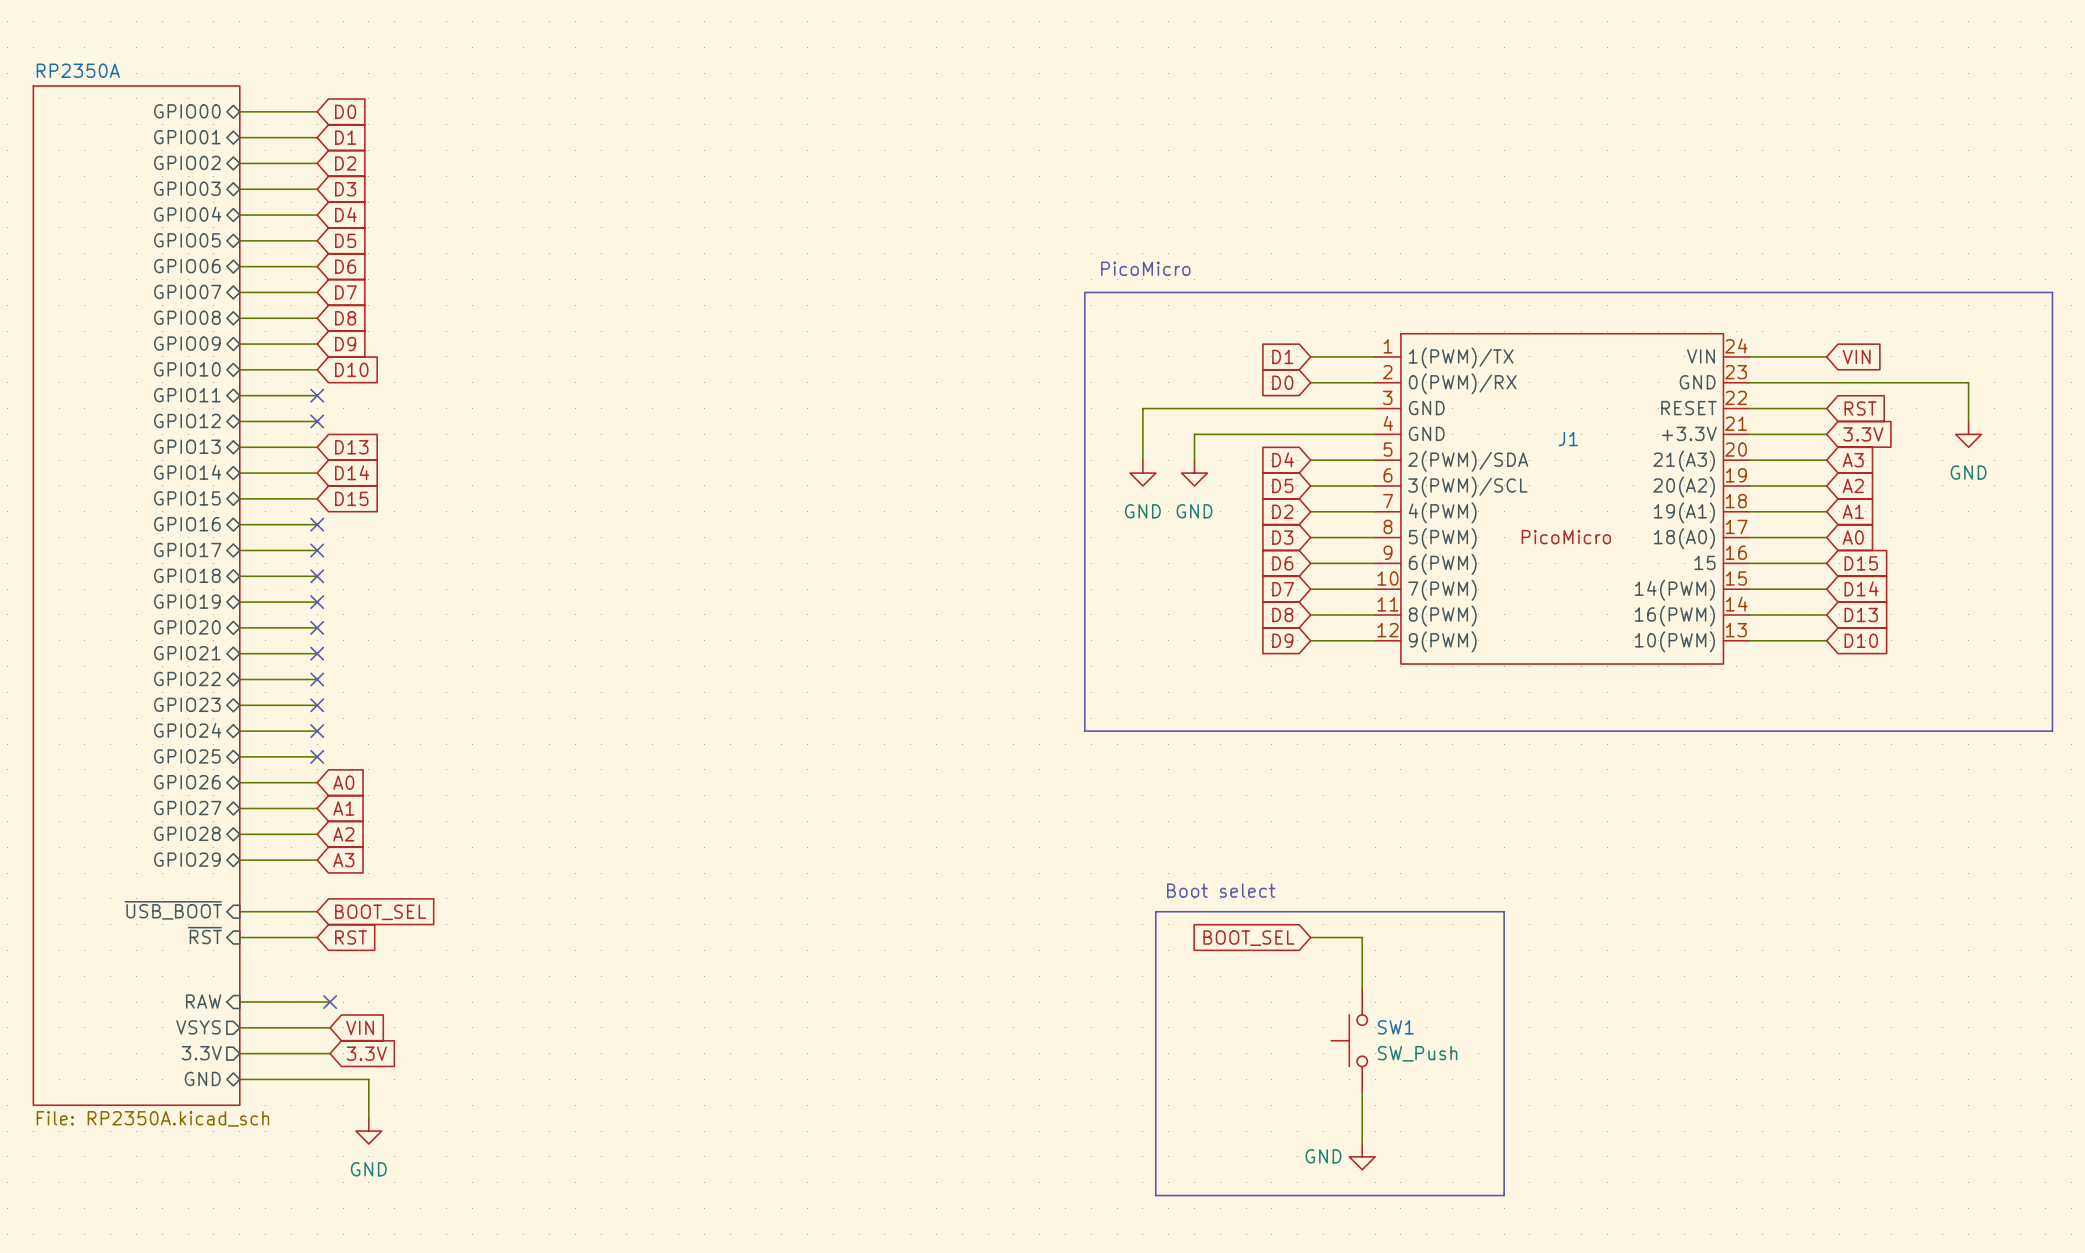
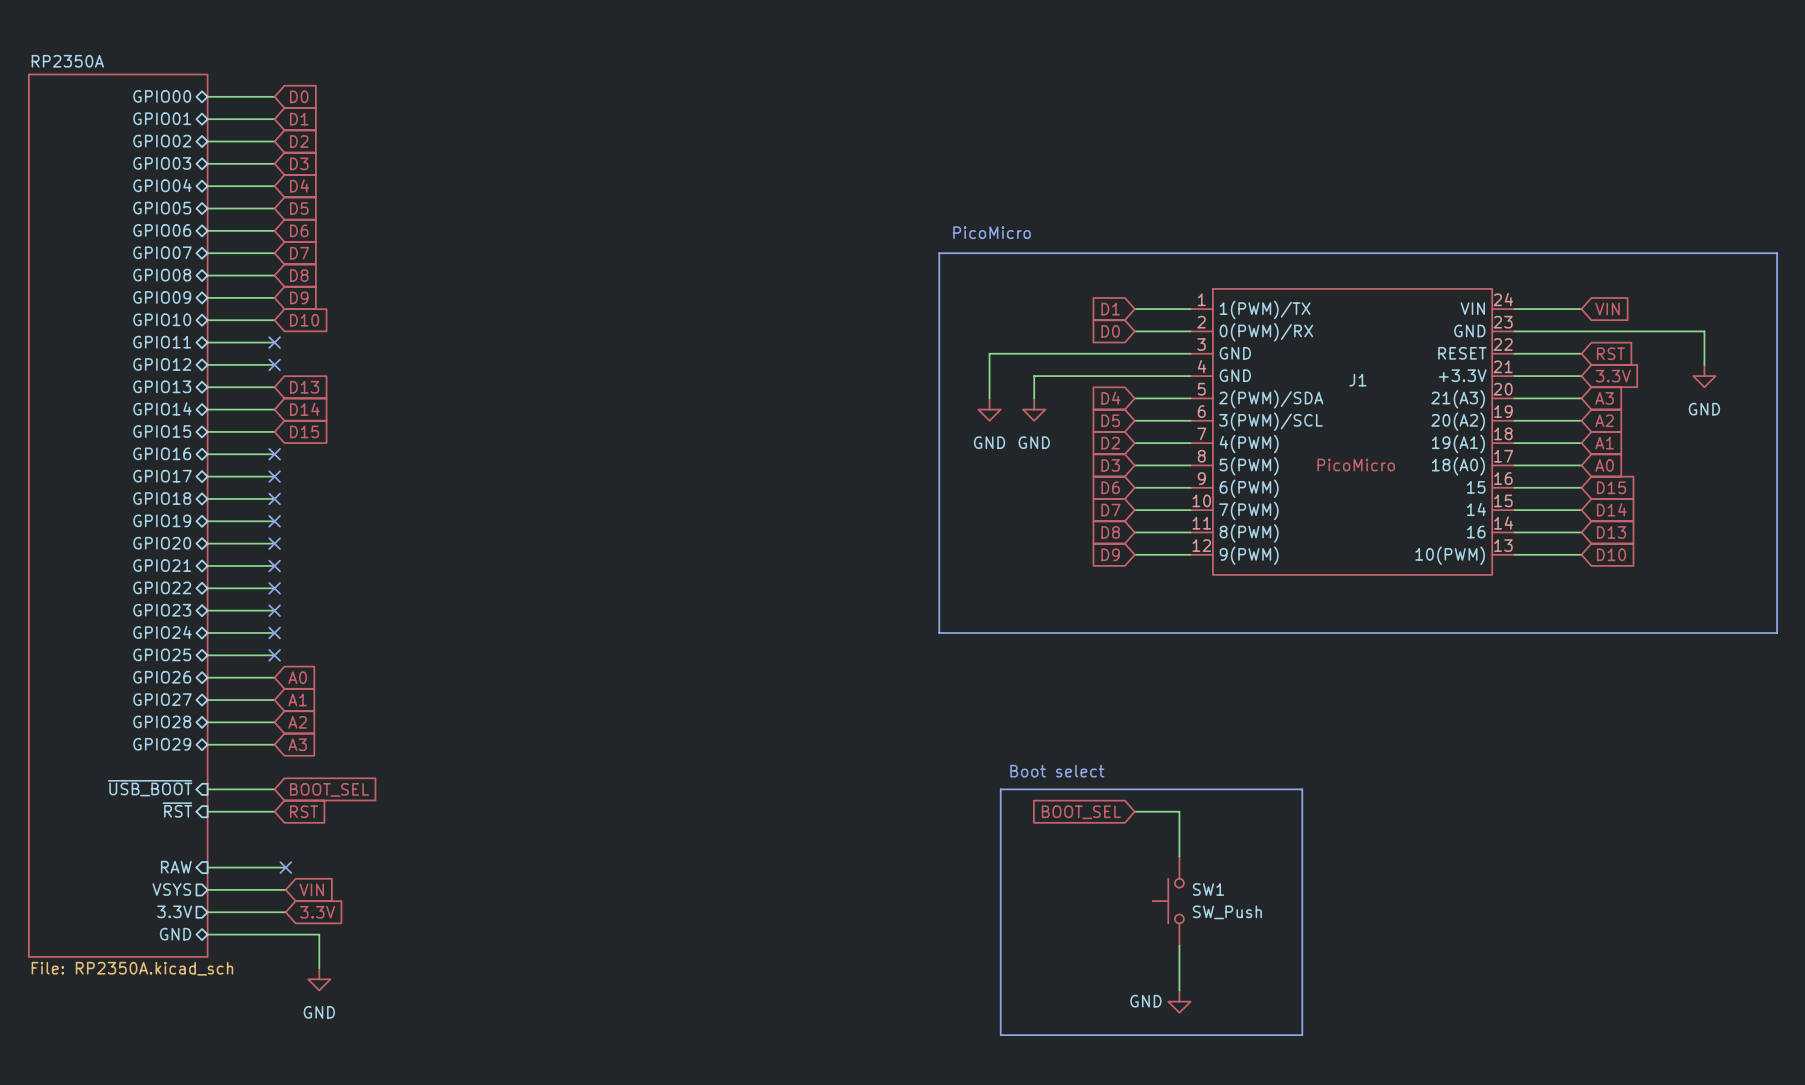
J1 pin name: 14(PWM) (1674, 590) -> 14 (1476, 509)
J1 pin name: 16(PWM) (1674, 616) -> 16 (1476, 532)

